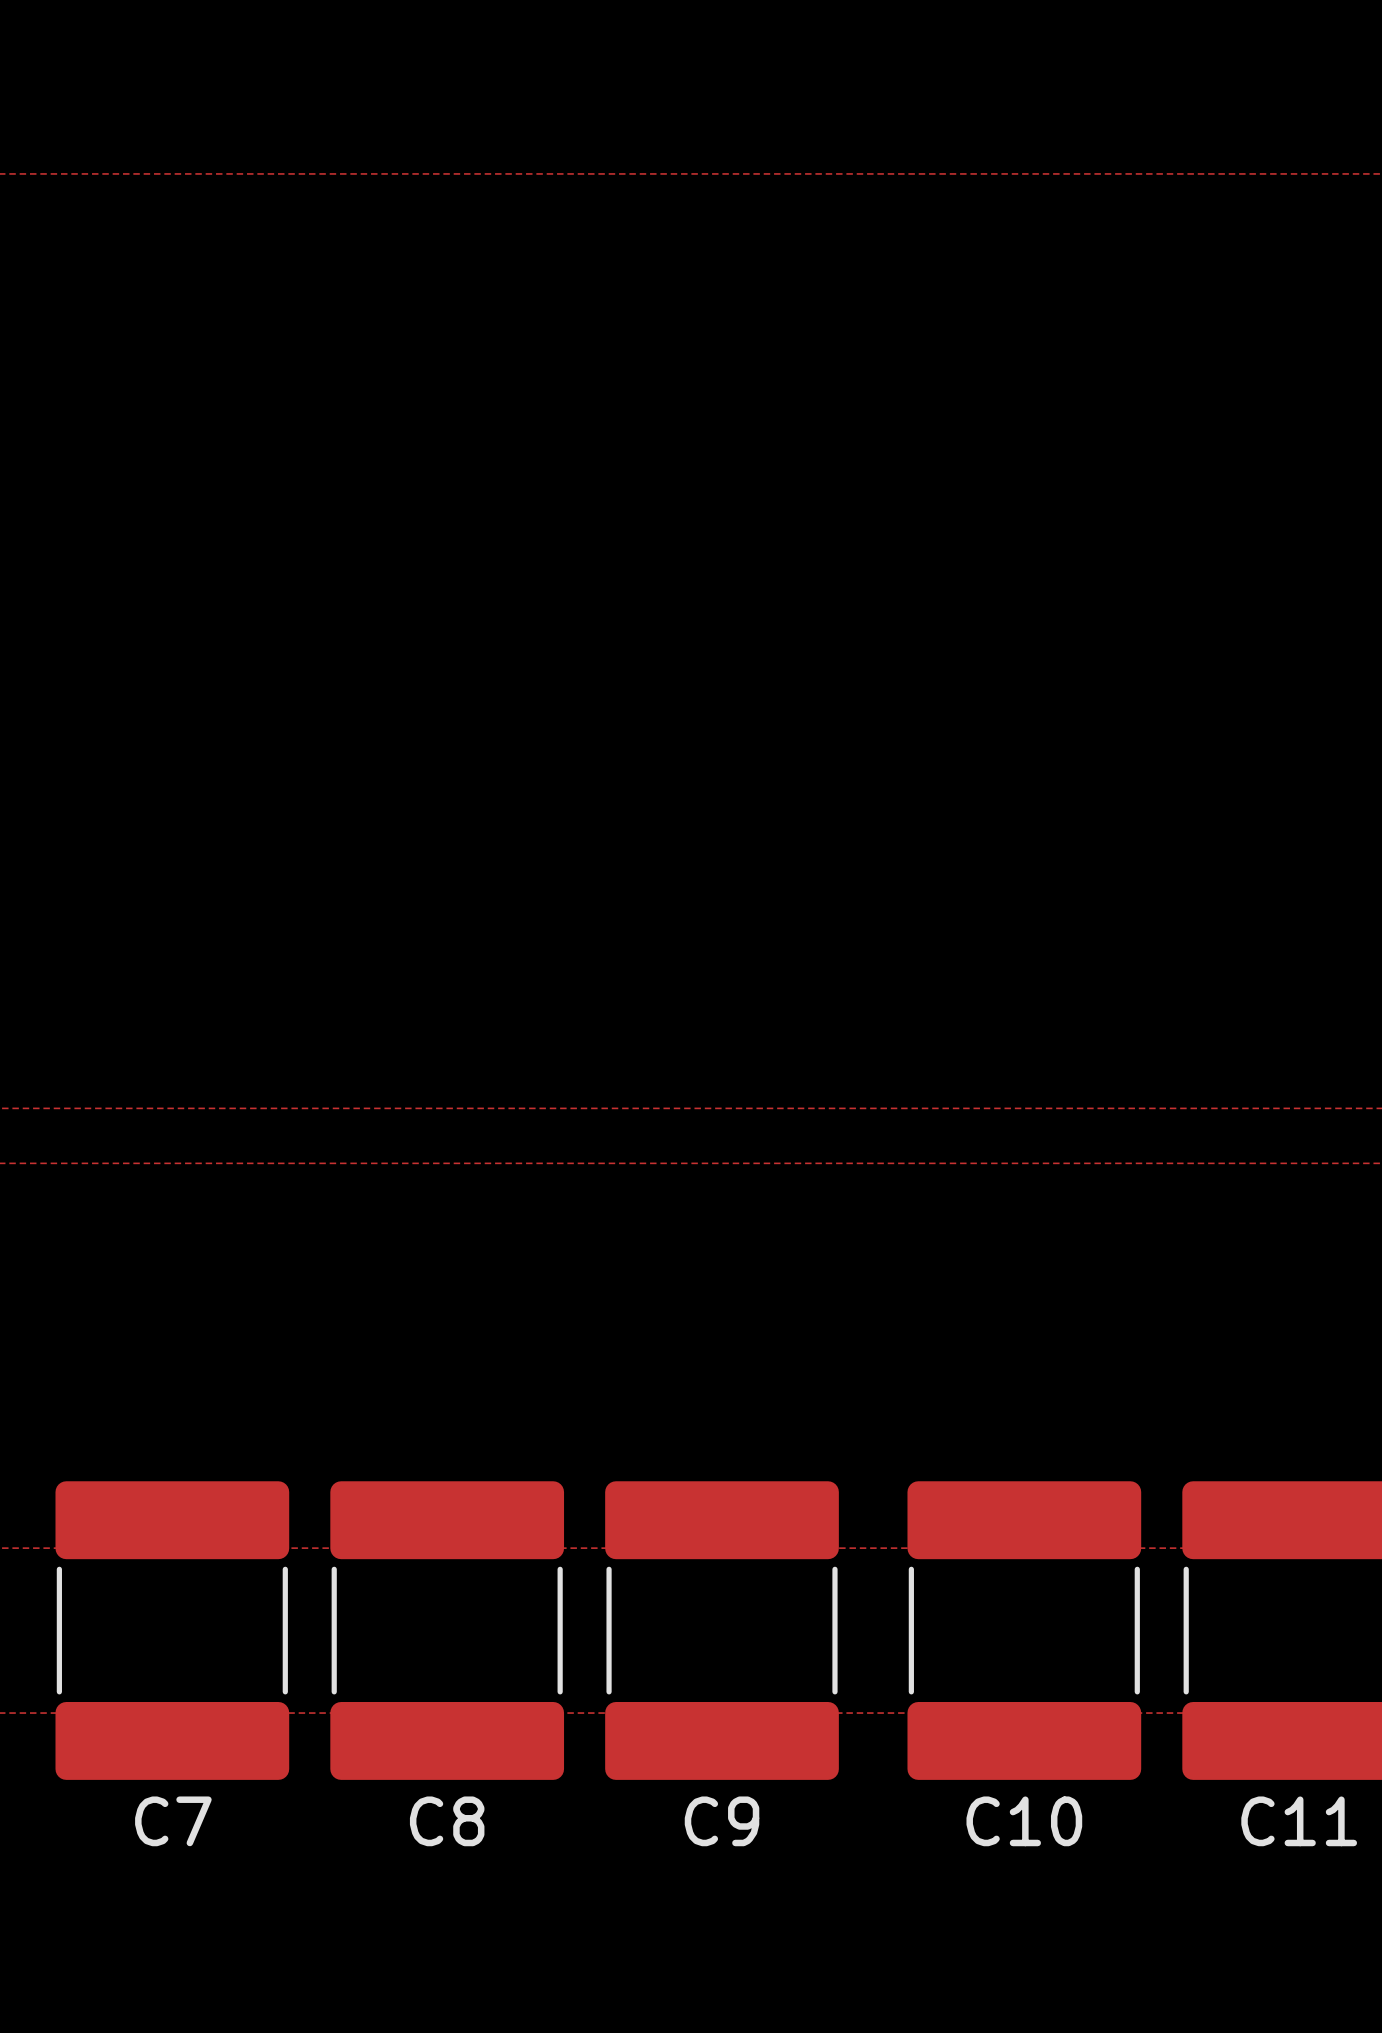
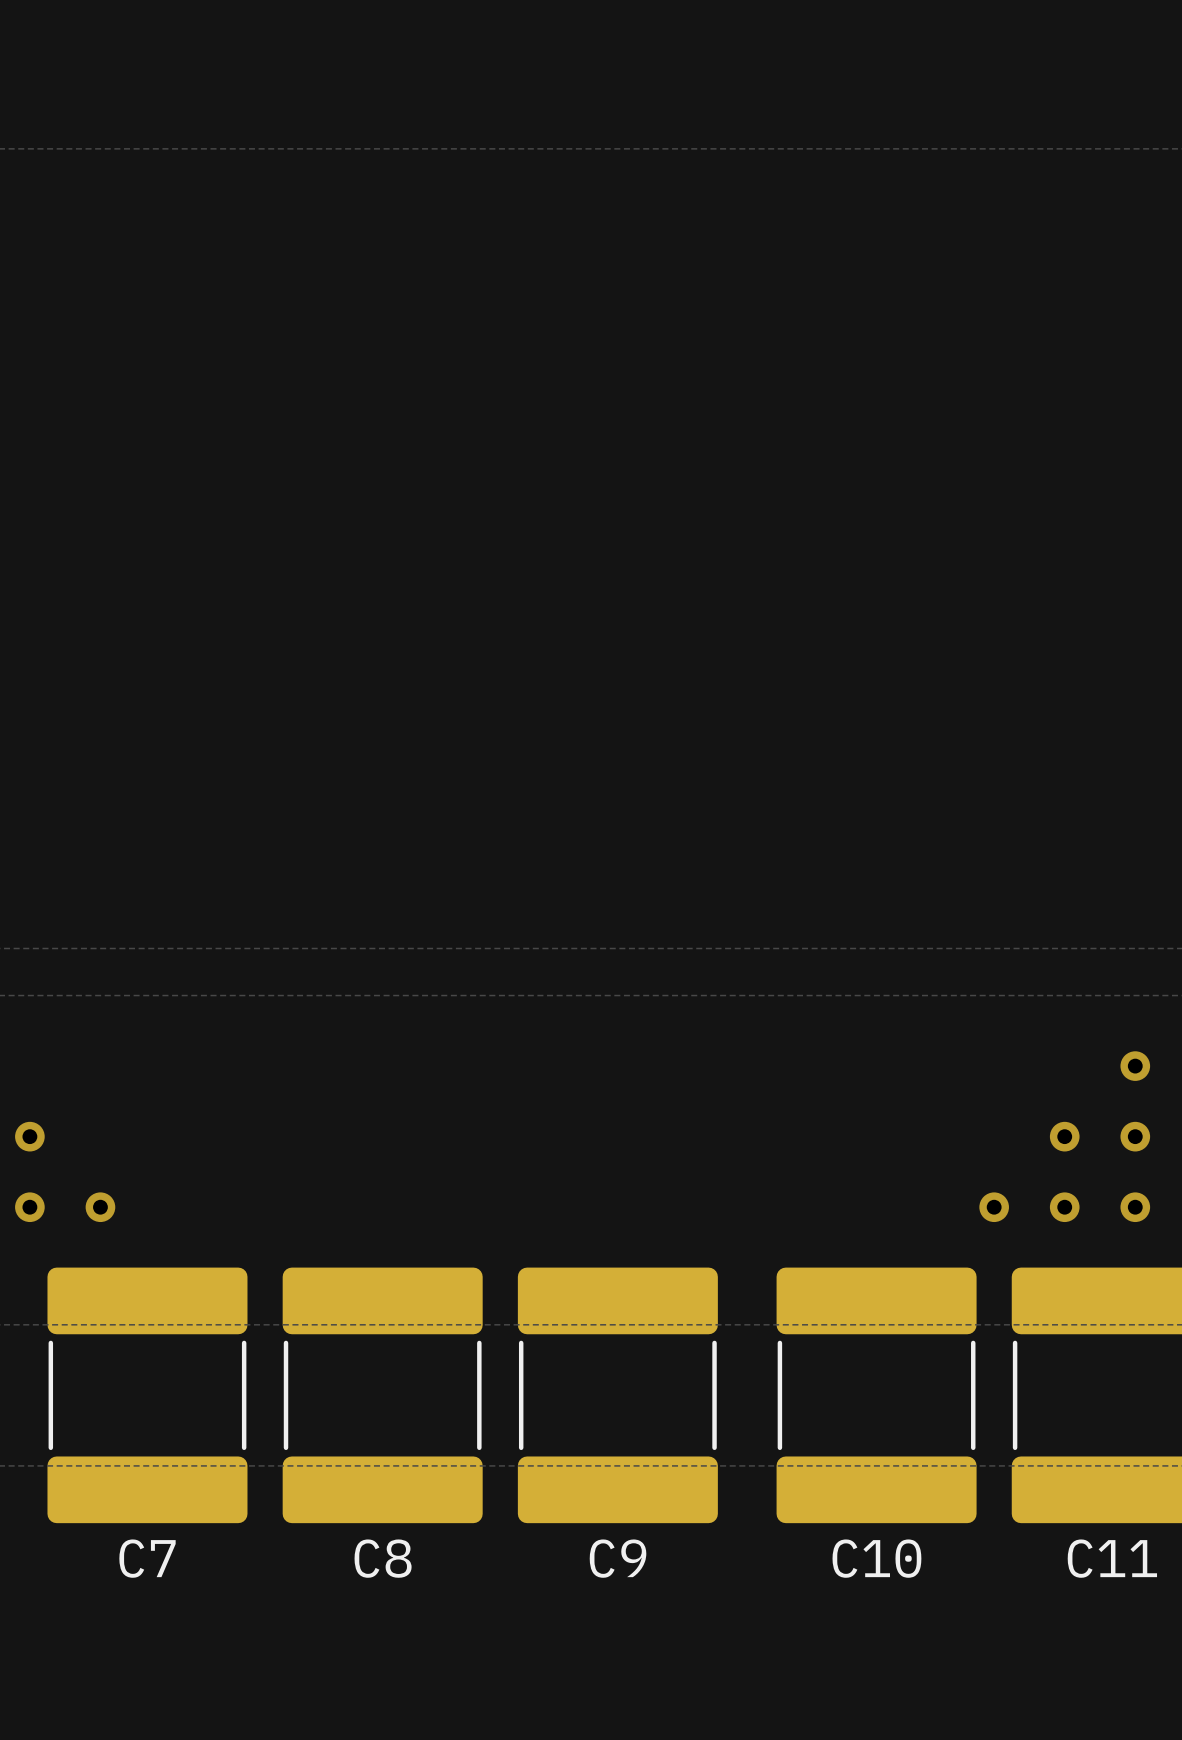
via: none -> (1135, 1066)
via: none -> (29, 1136)
via: none -> (1064, 1136)
via: none -> (1135, 1136)
via: none -> (29, 1207)
via: none -> (100, 1207)
via: none -> (994, 1207)
via: none -> (1064, 1207)
via: none -> (1135, 1207)

